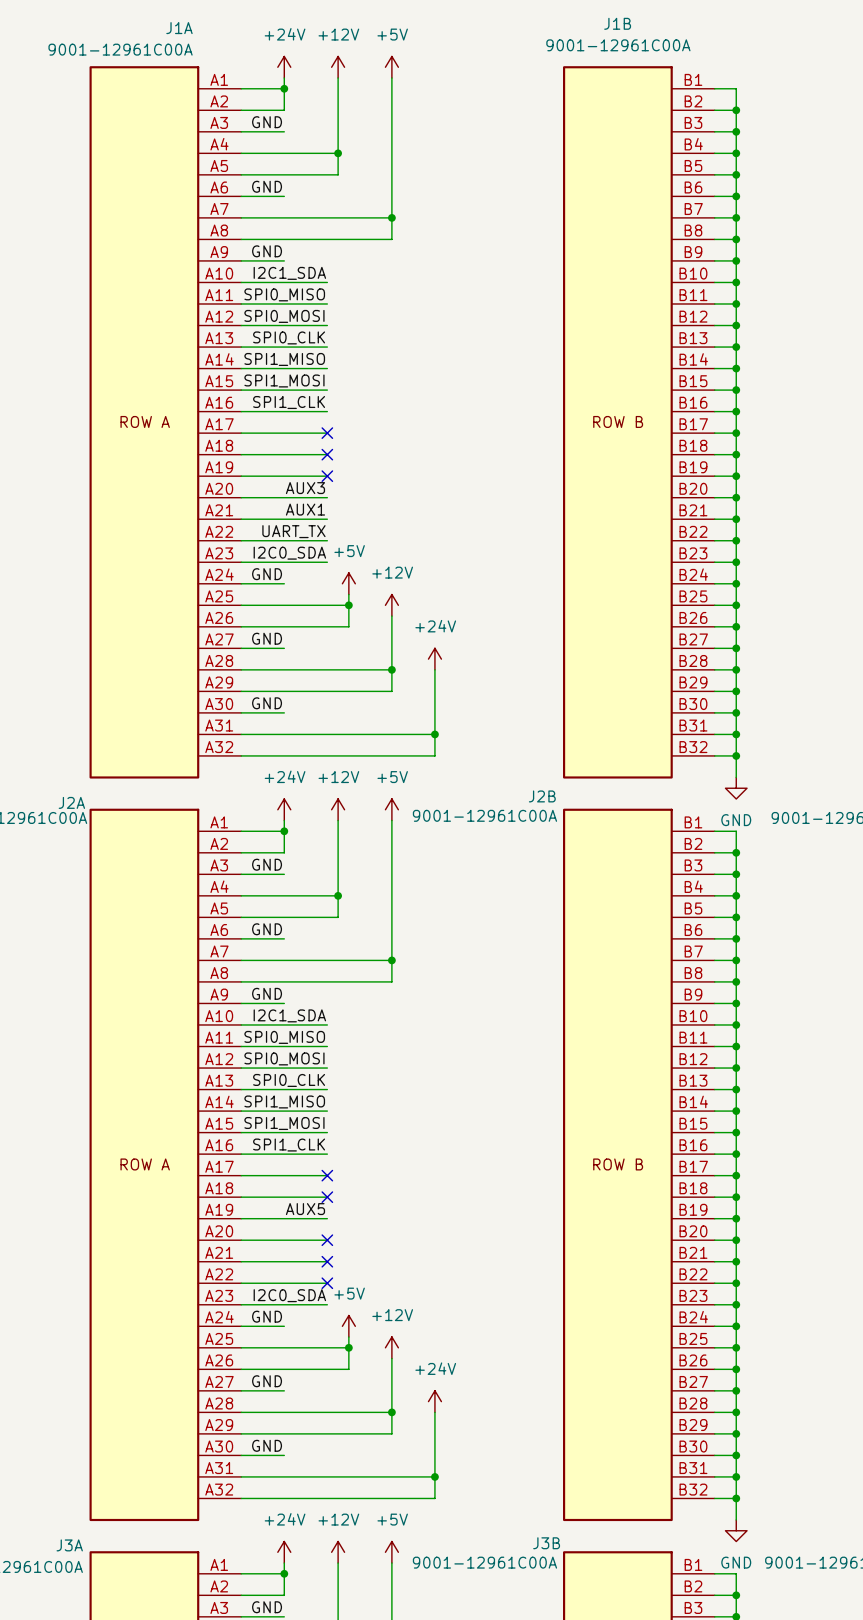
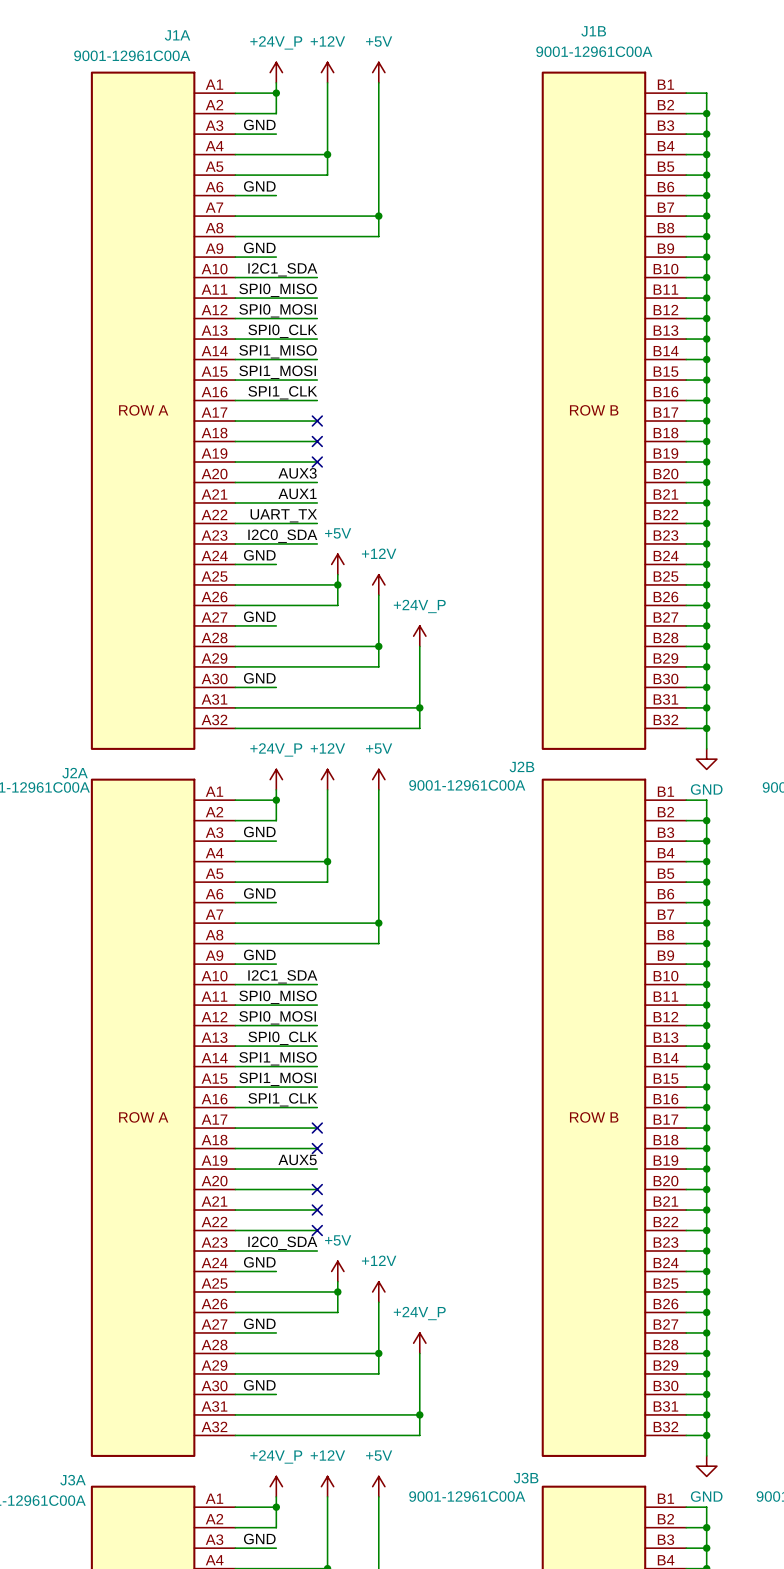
power symbol: +24V (284, 67) -> +24V_P (276, 72)
power symbol: +24V (434, 659) -> +24V_P (419, 636)
power symbol: +24V (284, 809) -> +24V_P (276, 779)
power symbol: +24V (434, 1401) -> +24V_P (419, 1343)
power symbol: +24V (284, 1552) -> +24V_P (276, 1486)

